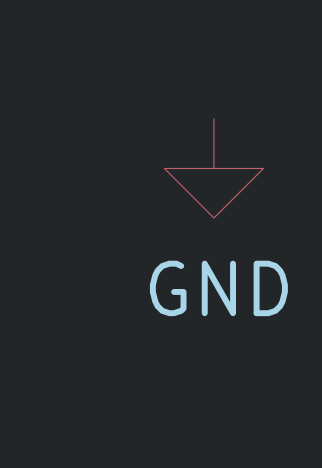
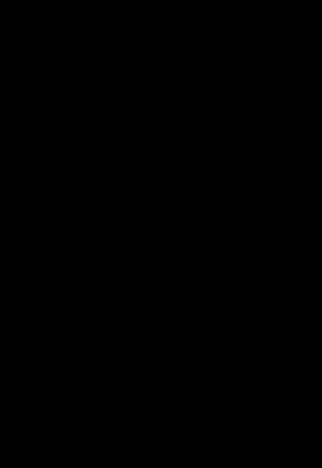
power symbol: GND (213, 168) -> none

